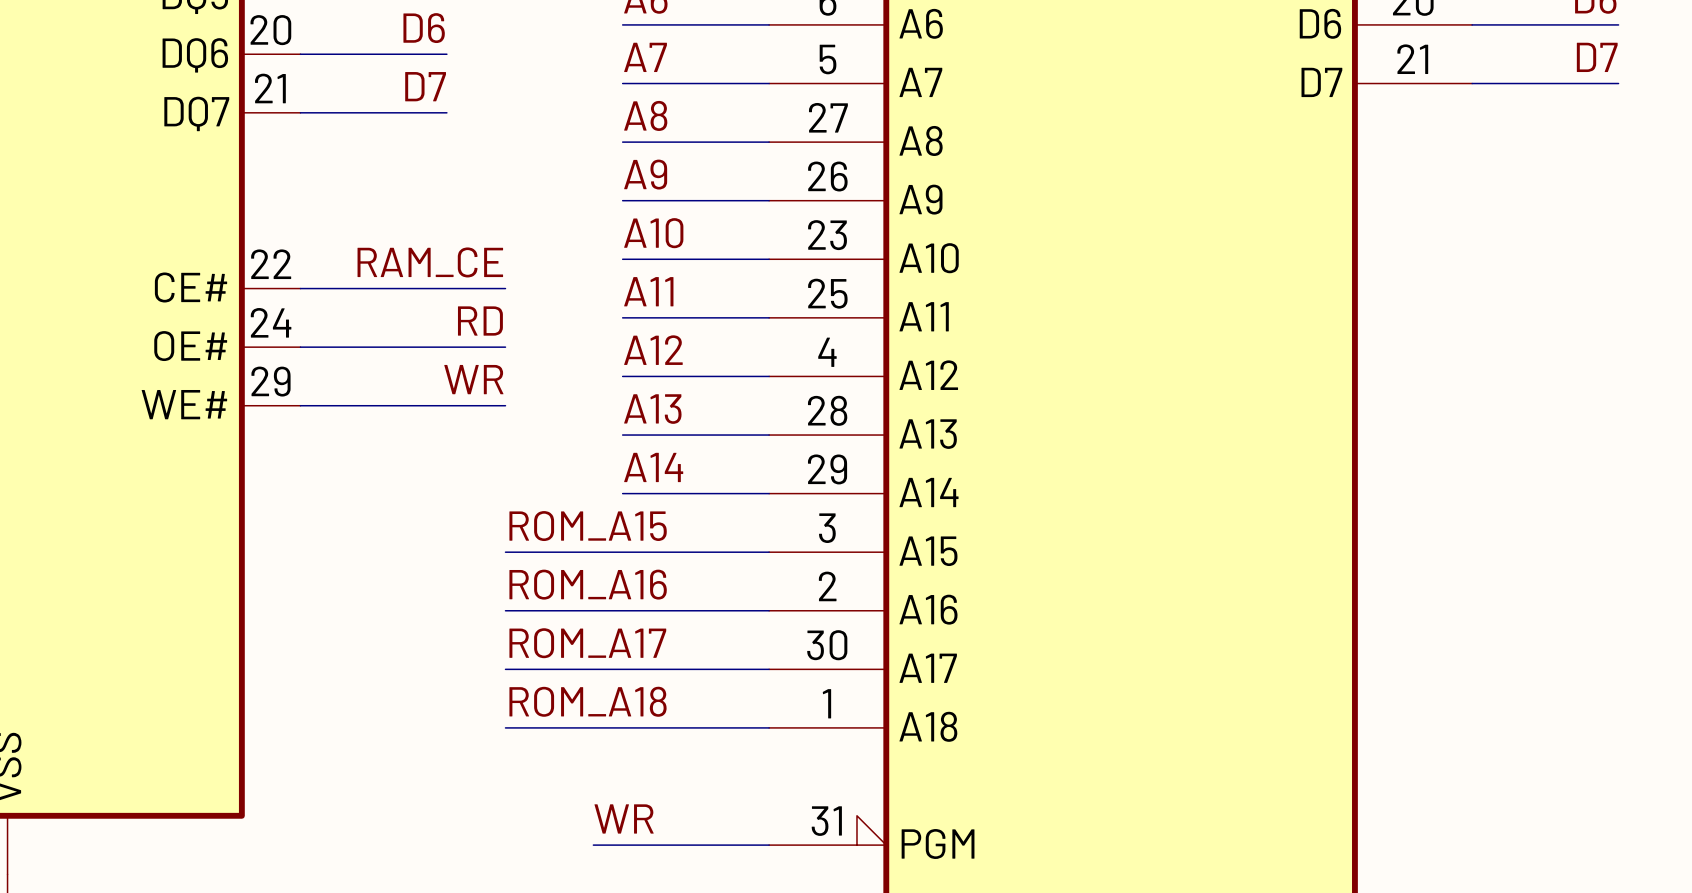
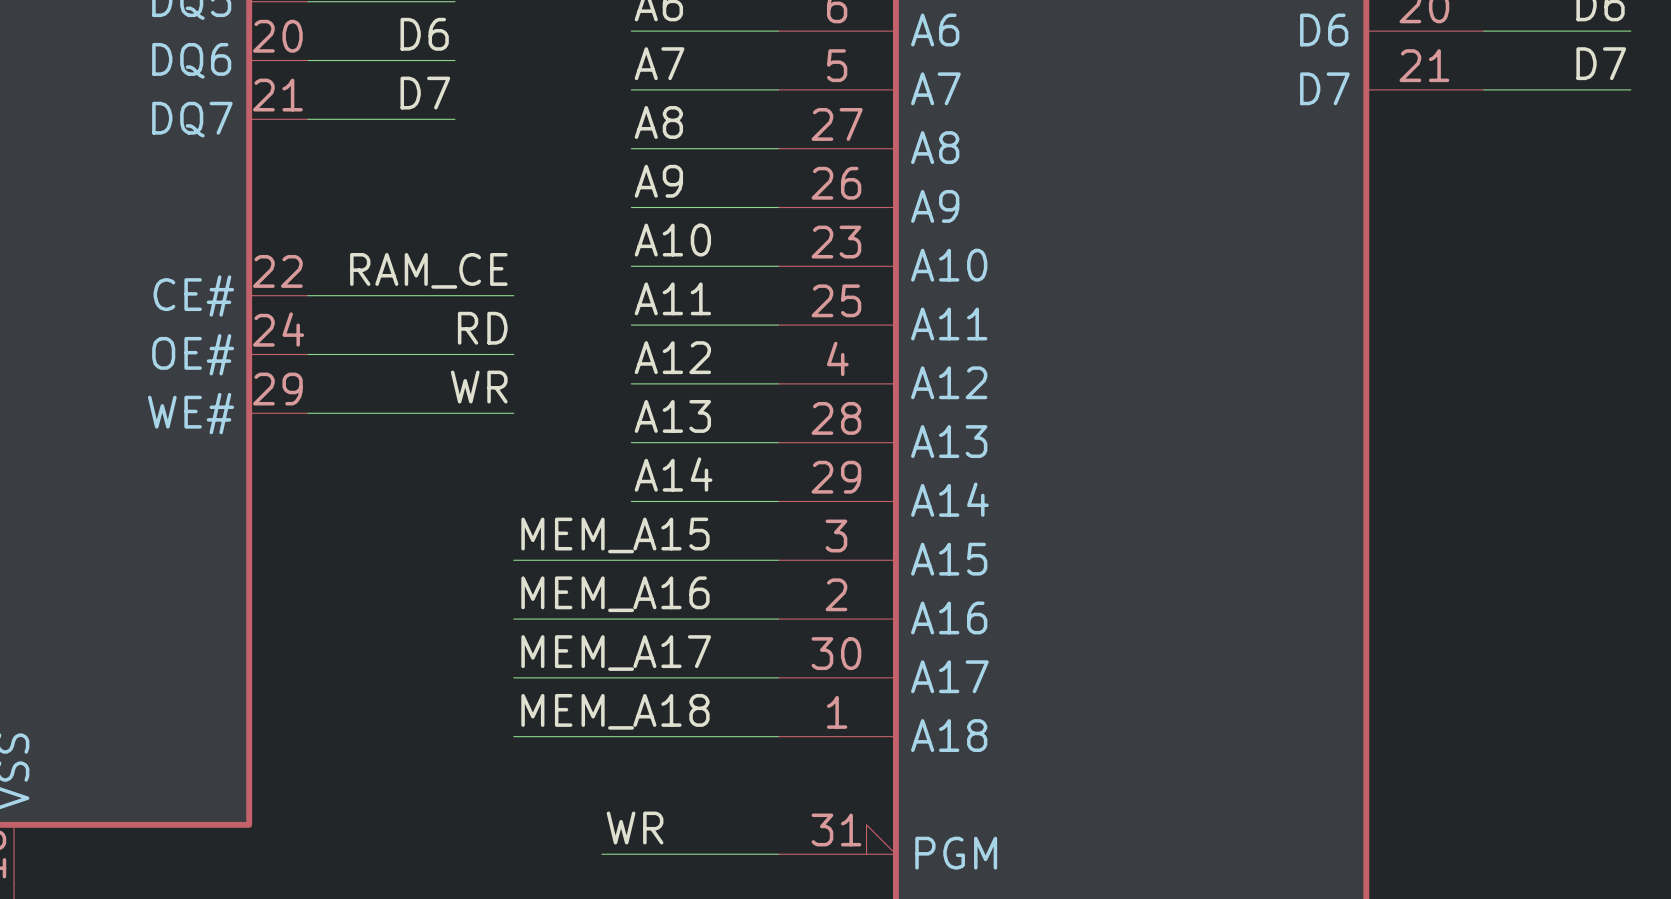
label: ROM_A15 (588, 526) -> MEM_A15 (615, 535)
label: ROM_A16 (588, 584) -> MEM_A16 (615, 594)
label: ROM_A17 (587, 643) -> MEM_A17 (616, 653)
label: ROM_A18 (588, 701) -> MEM_A18 (615, 711)

